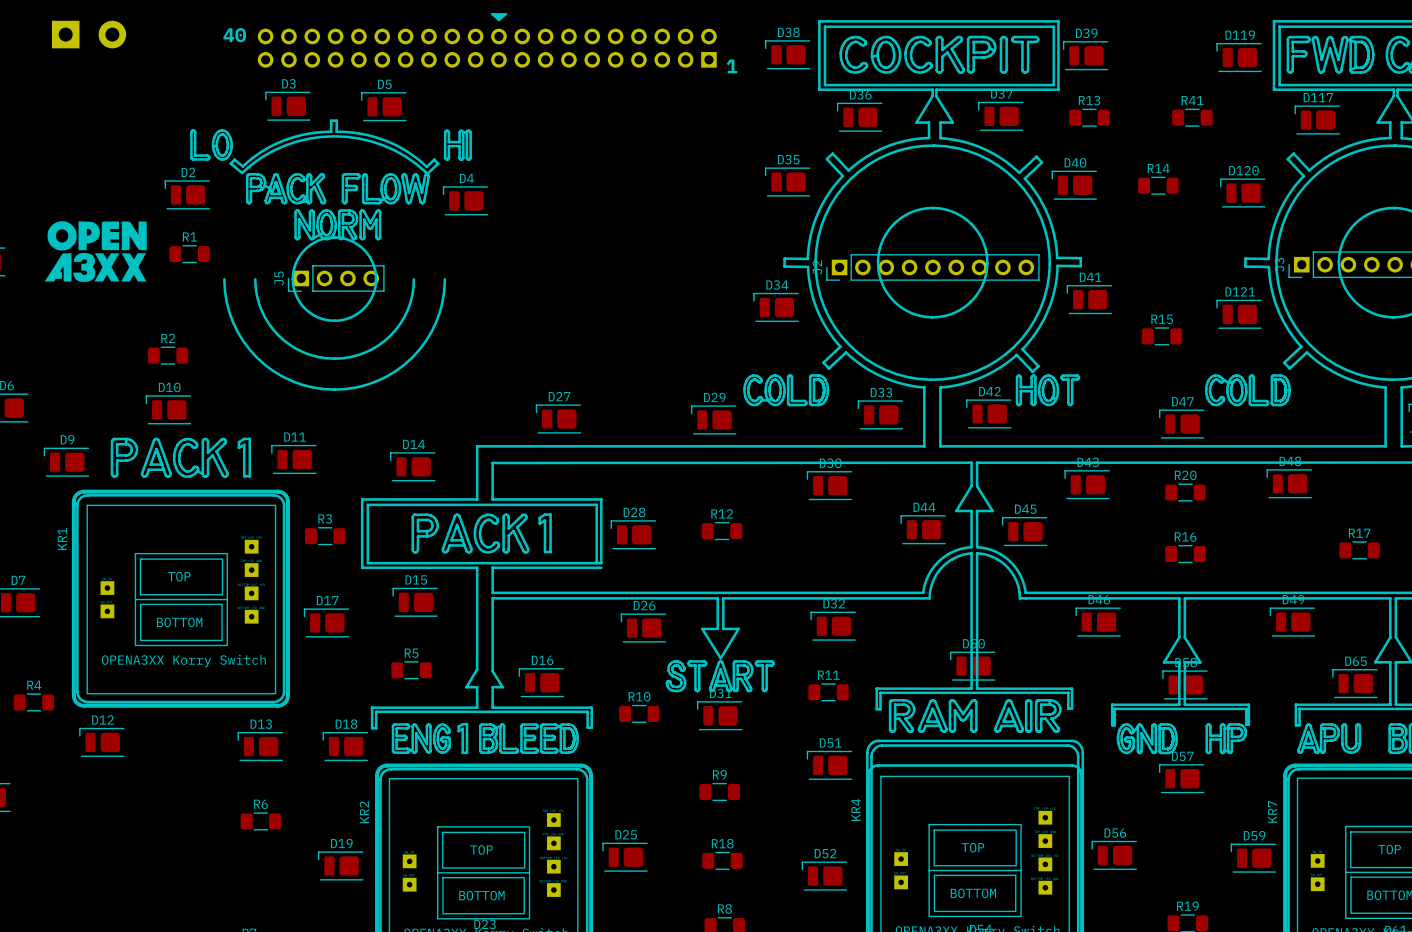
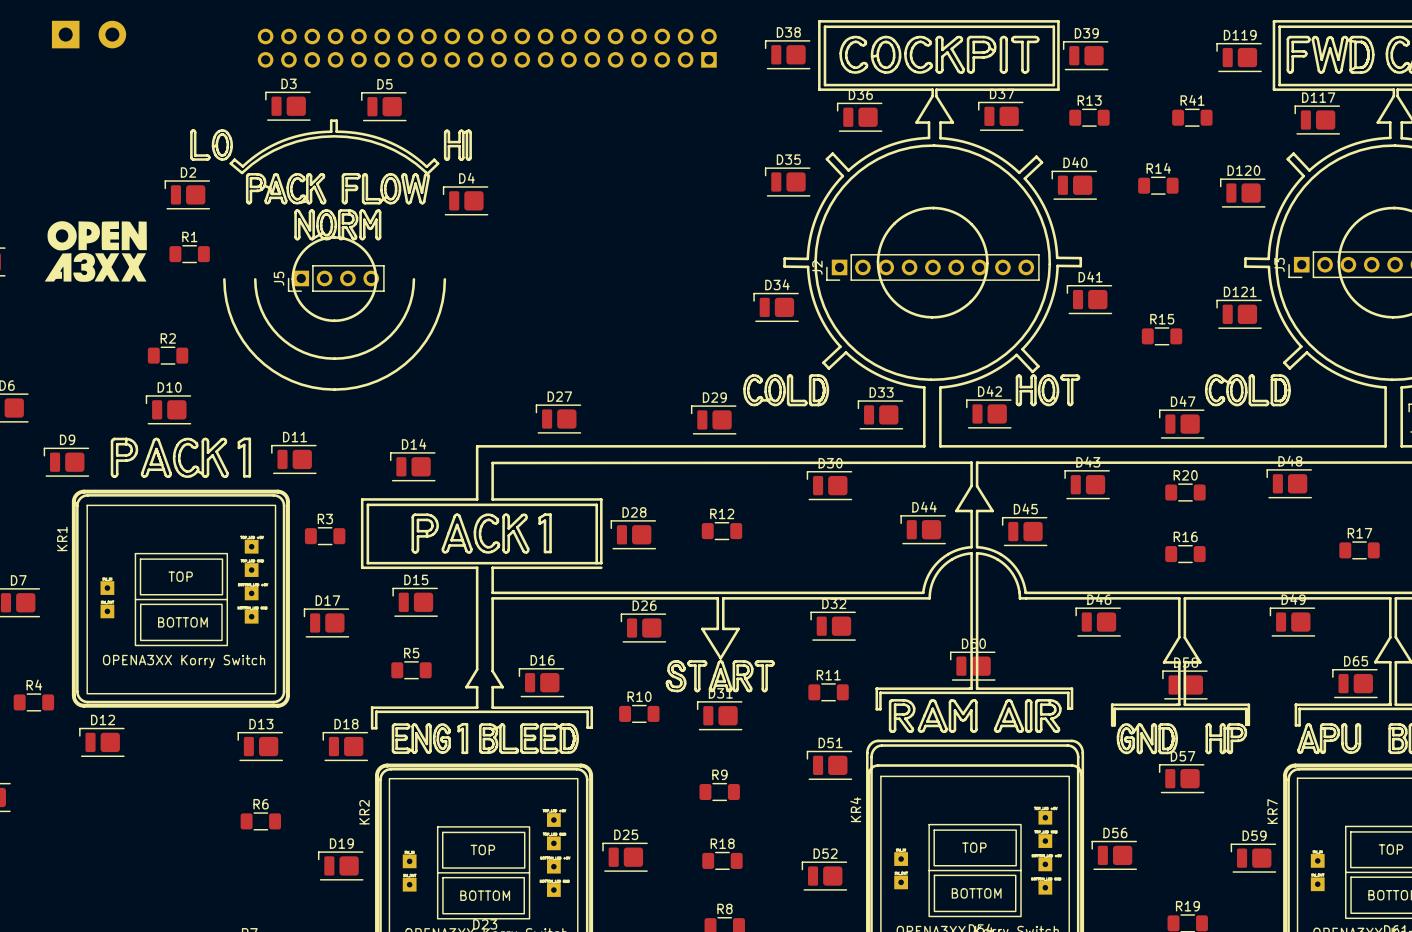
drawing: [490, 13, 508, 22] -> none
text: 40 (234, 35) -> none
text: 1 (731, 66) -> none

